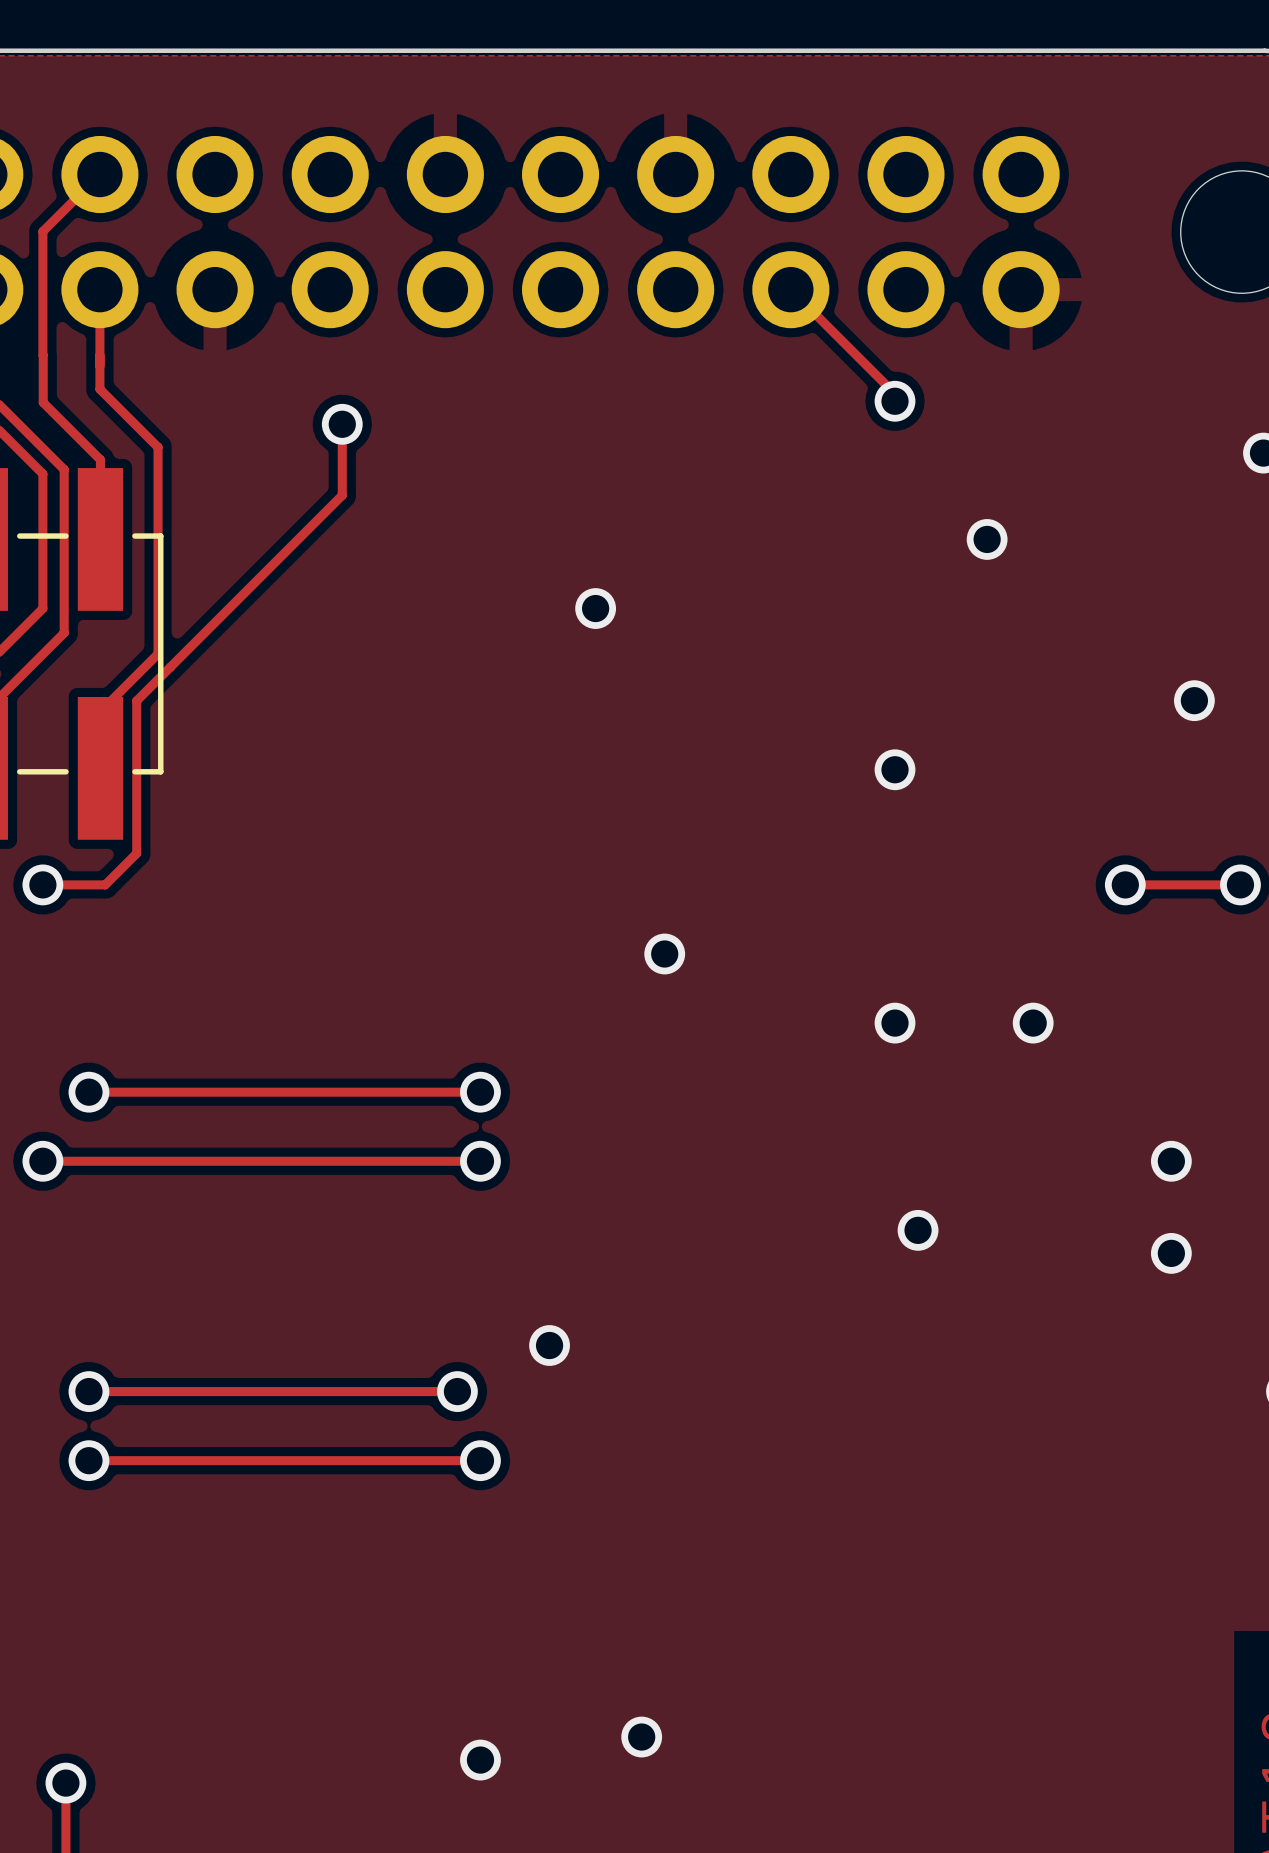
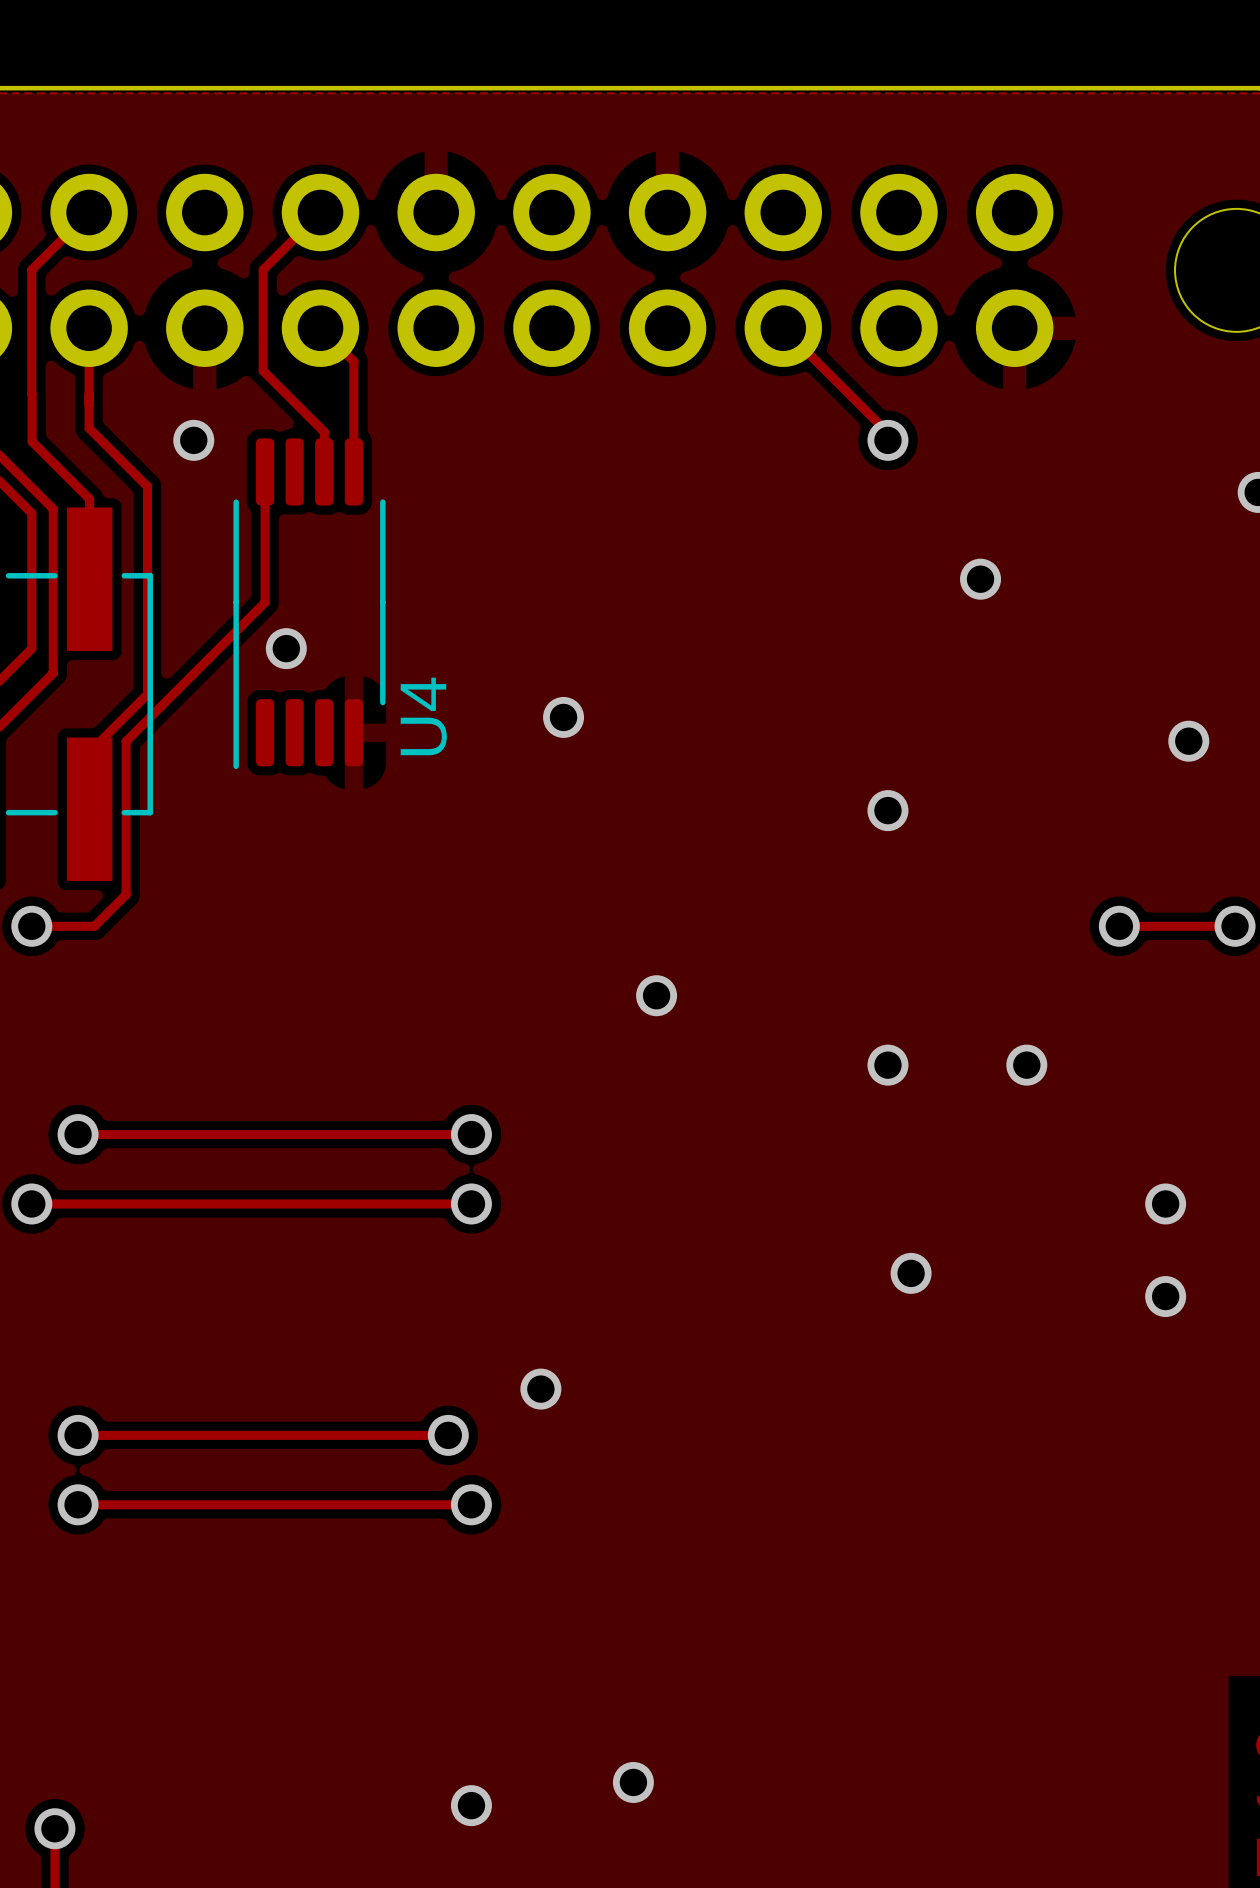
track: none -> (320, 212) (263, 269) (263, 370) (324, 432) (324, 471)
track: none -> (320, 328) (353, 361) (353, 471)
via: none -> (193, 440)
track: (342, 424) (342, 495) (275, 562) -> (265, 471) (265, 602)
via: (342, 424) -> none
U4: none -> (309, 603)
via: none -> (286, 648)
via position: (595, 608) -> (563, 717)

